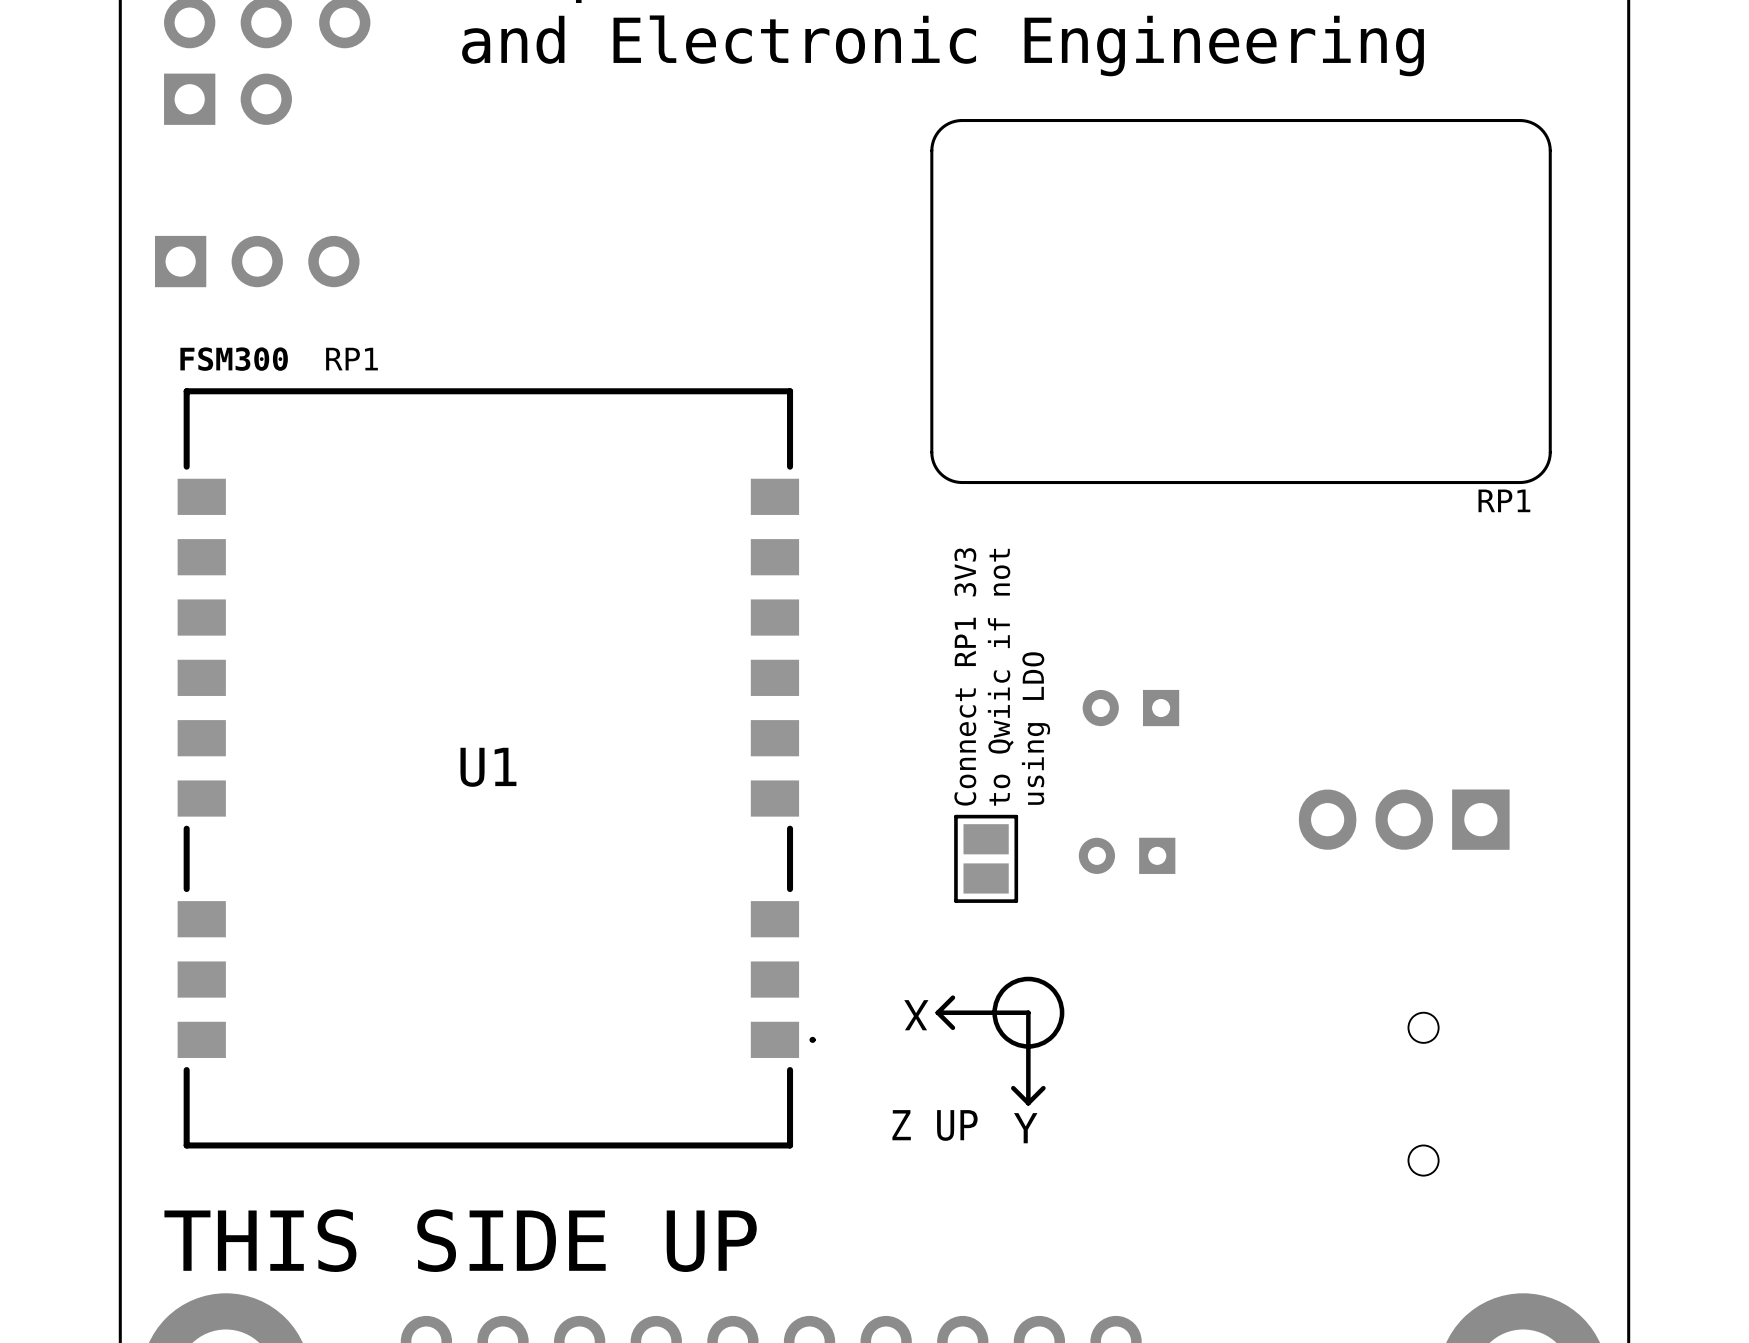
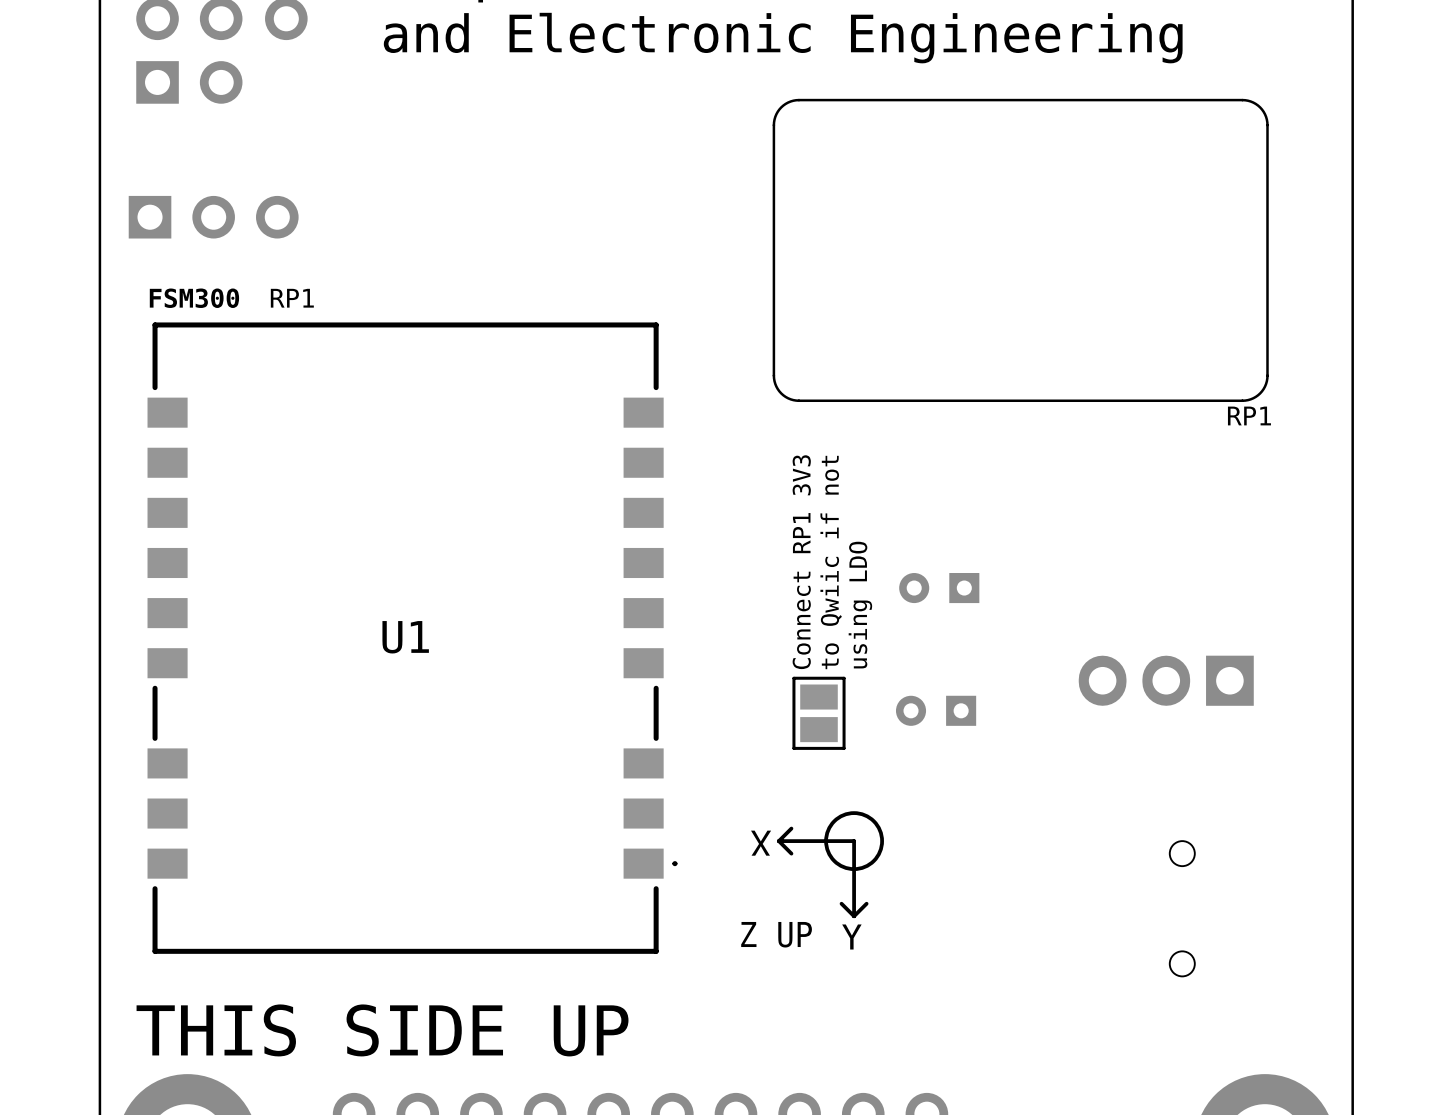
part footprint: [930, 119, 1552, 485] -> [772, 98, 1269, 403]

